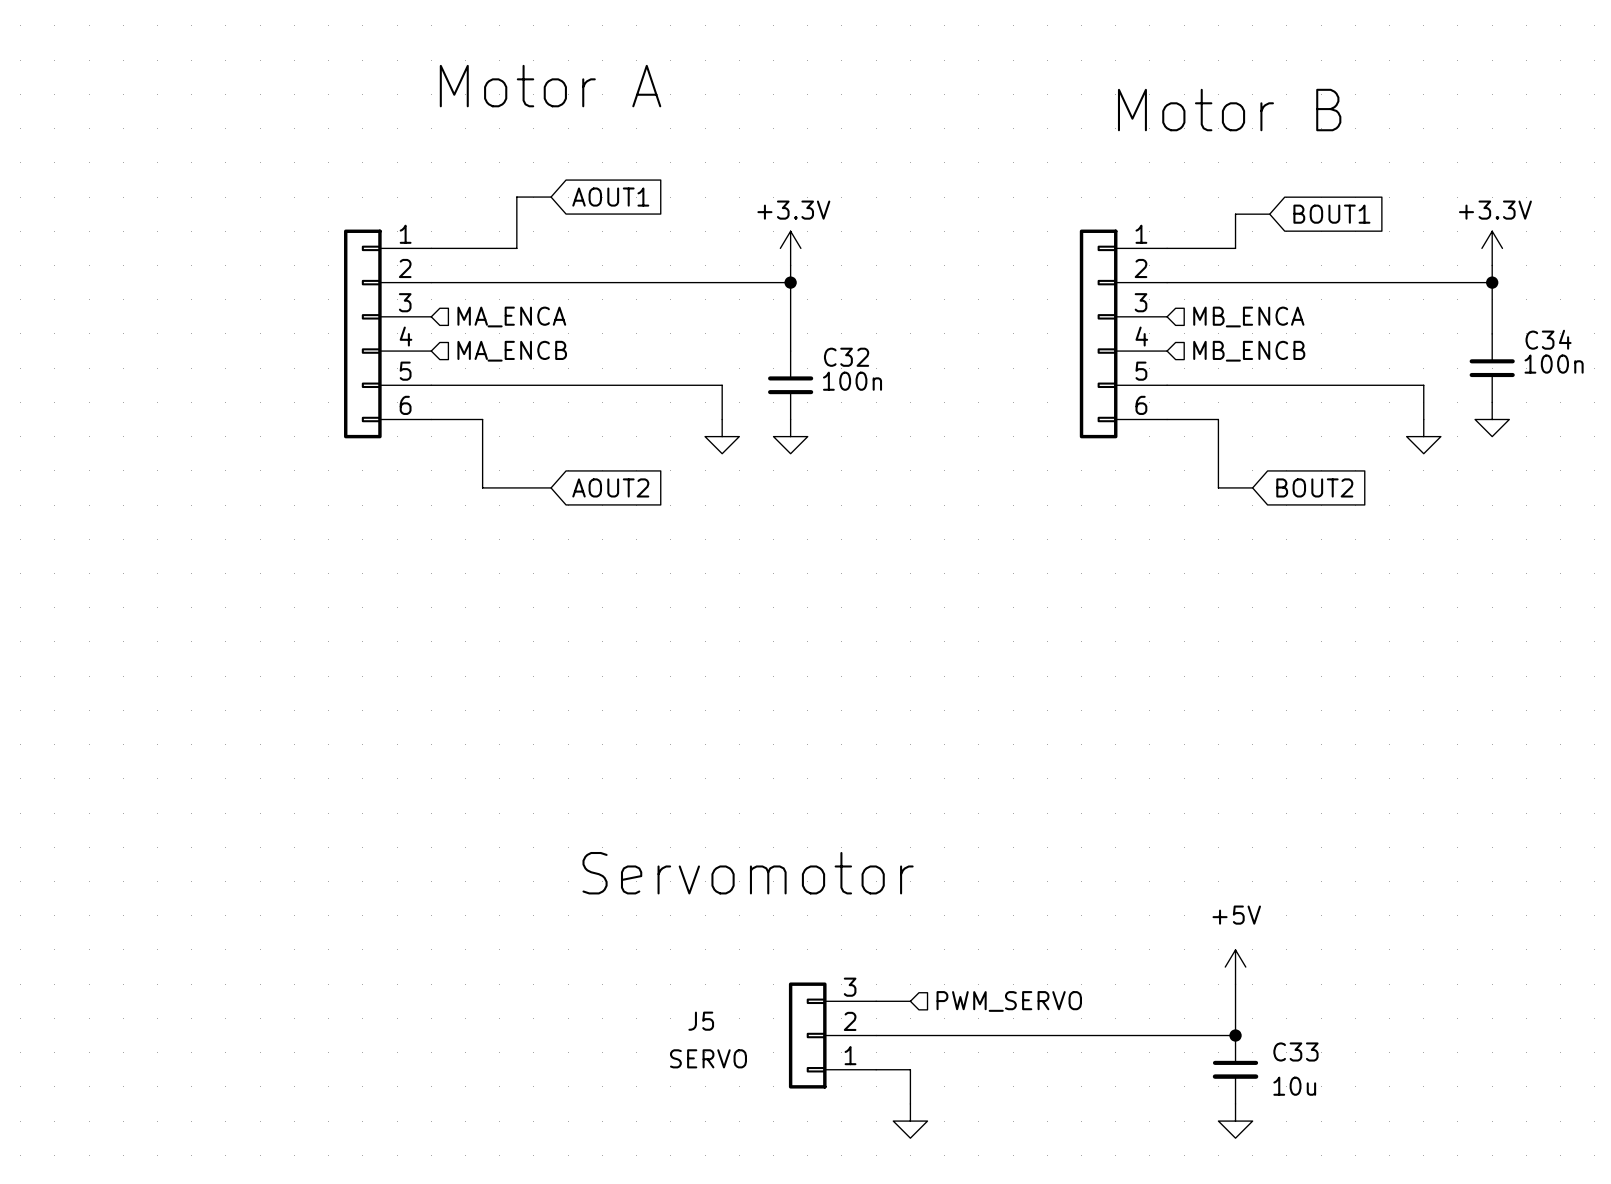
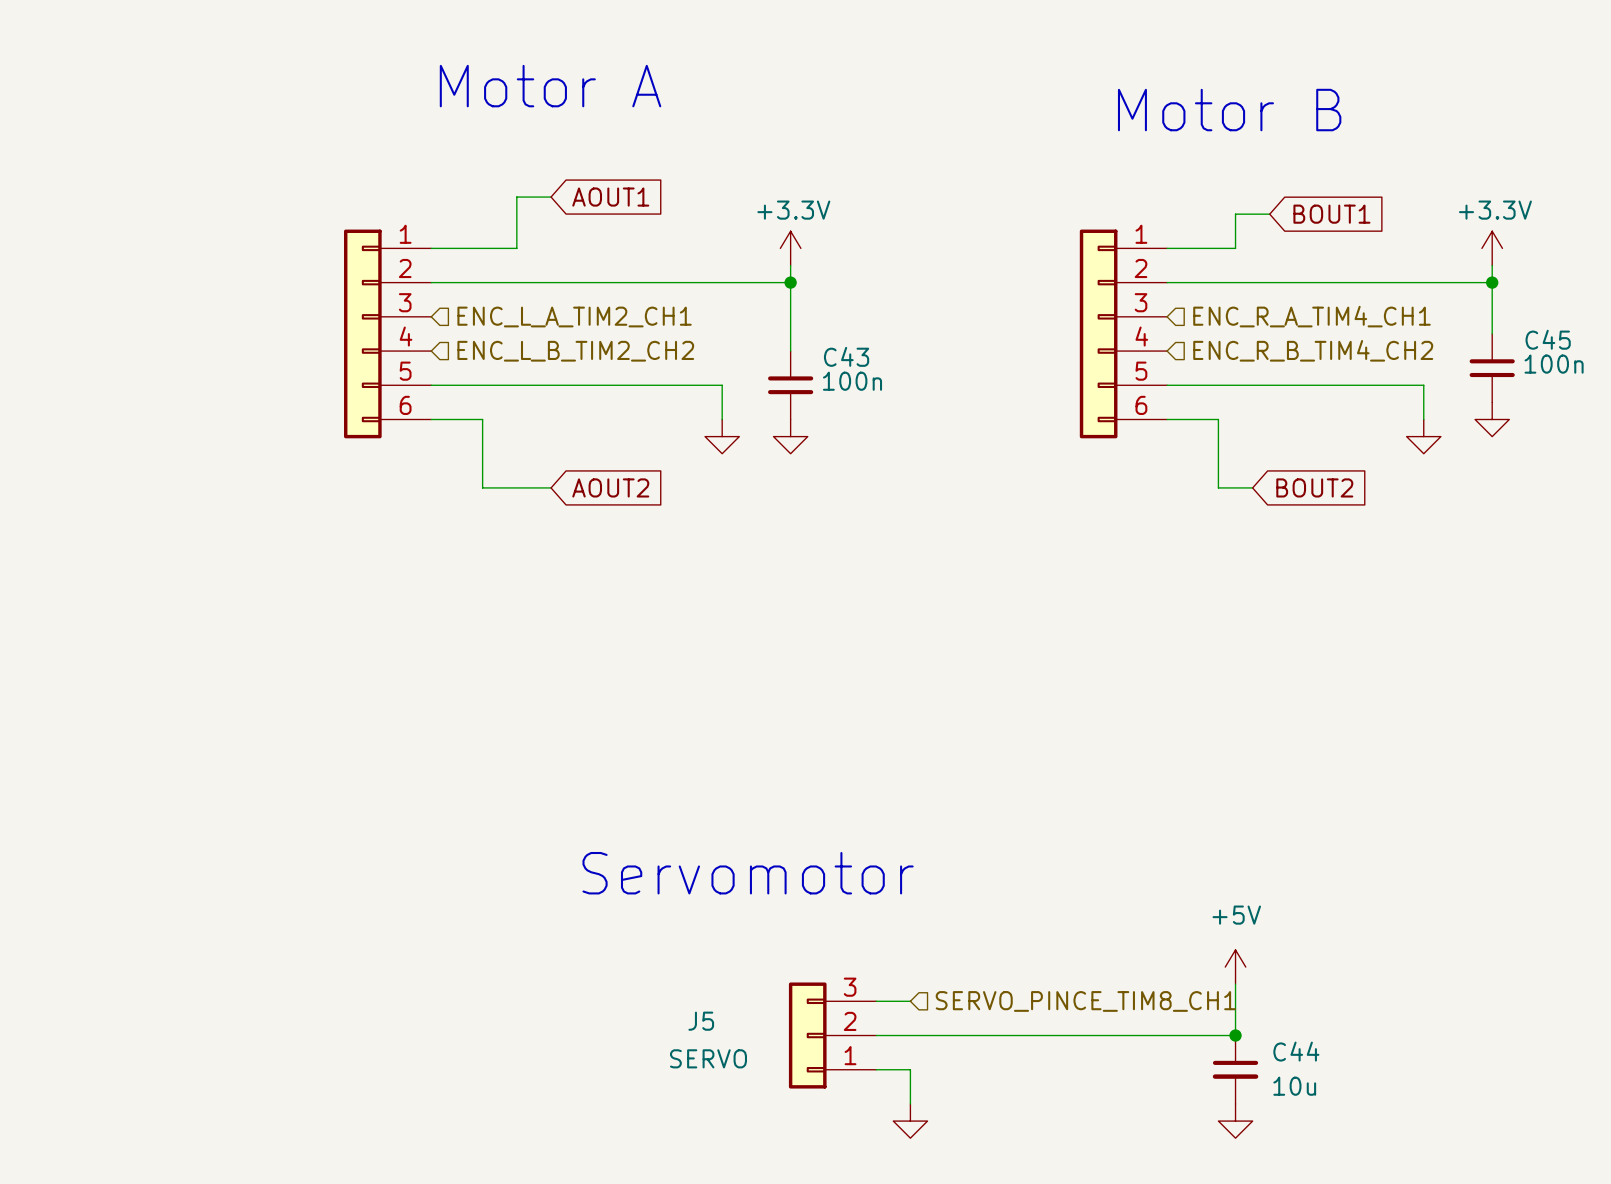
hierarchical label: MA_ENCA (511, 317) -> ENC_L_A_TIM2_CH1 (574, 317)
hierarchical label: MB_ENCA (1248, 317) -> ENC_R_A_TIM4_CH1 (1311, 316)
C34 name: C34 (1548, 339) -> C45 (1548, 339)
hierarchical label: MA_ENCB (512, 351) -> ENC_L_B_TIM2_CH2 (575, 351)
hierarchical label: MB_ENCB (1249, 351) -> ENC_R_B_TIM4_CH2 (1313, 350)
C32 name: C32 (846, 357) -> C43 (846, 356)
hierarchical label: PWM_SERVO (1009, 1001) -> SERVO_PINCE_TIM8_CH1 (1085, 1001)
C33 name: C33 (1295, 1051) -> C44 (1296, 1051)

